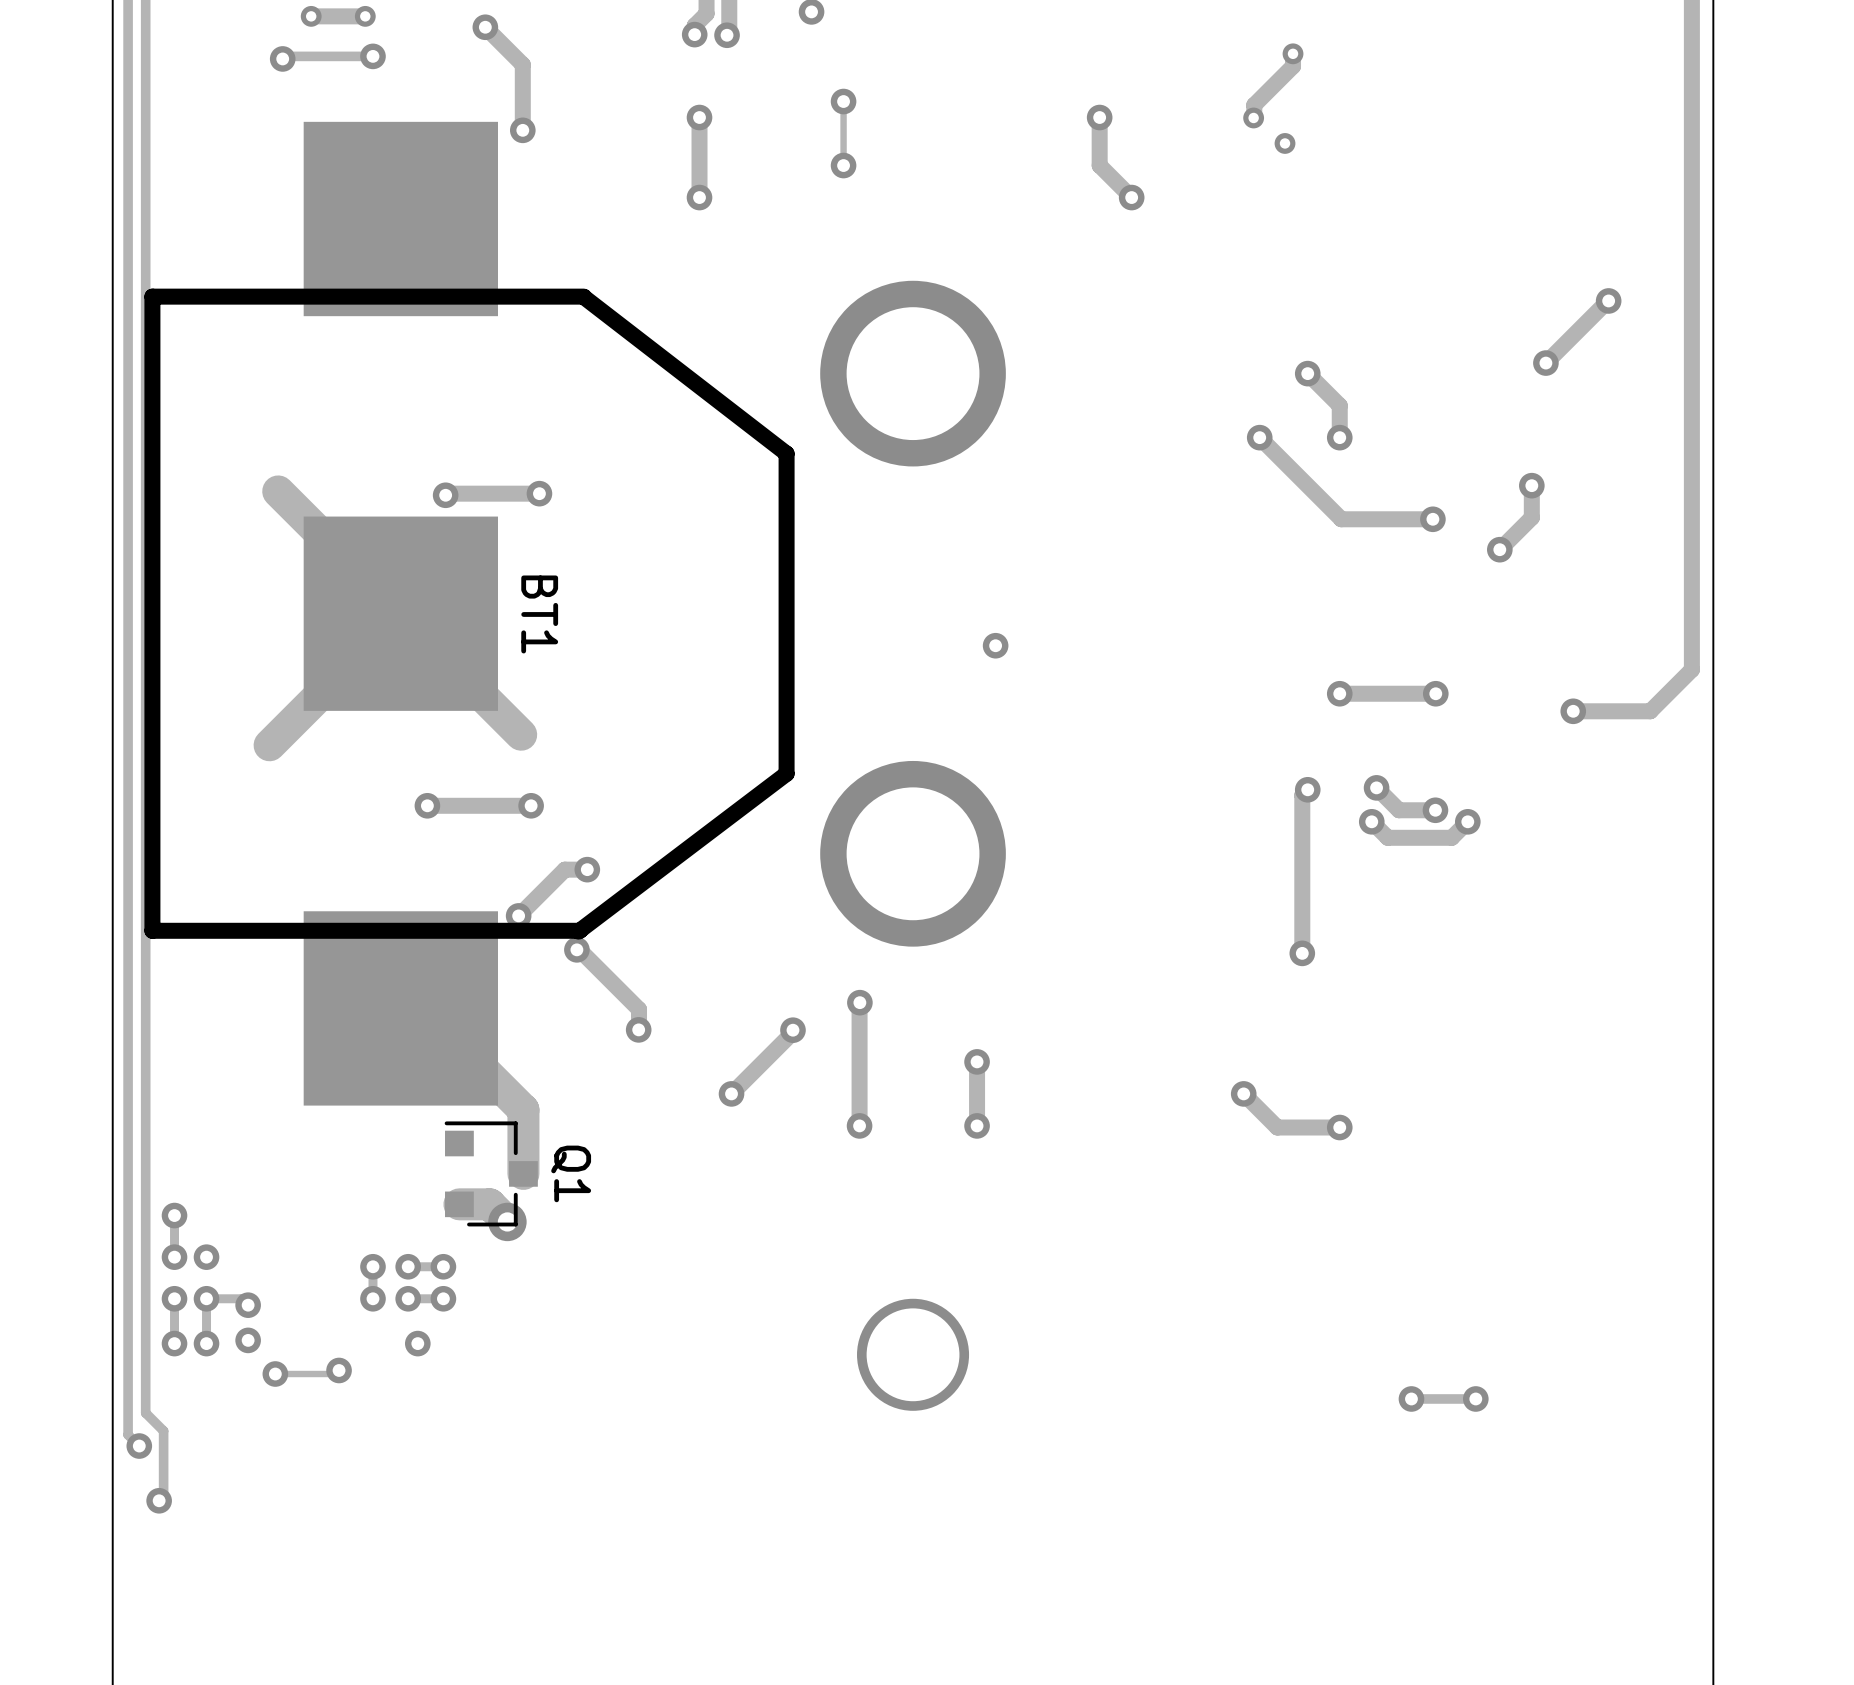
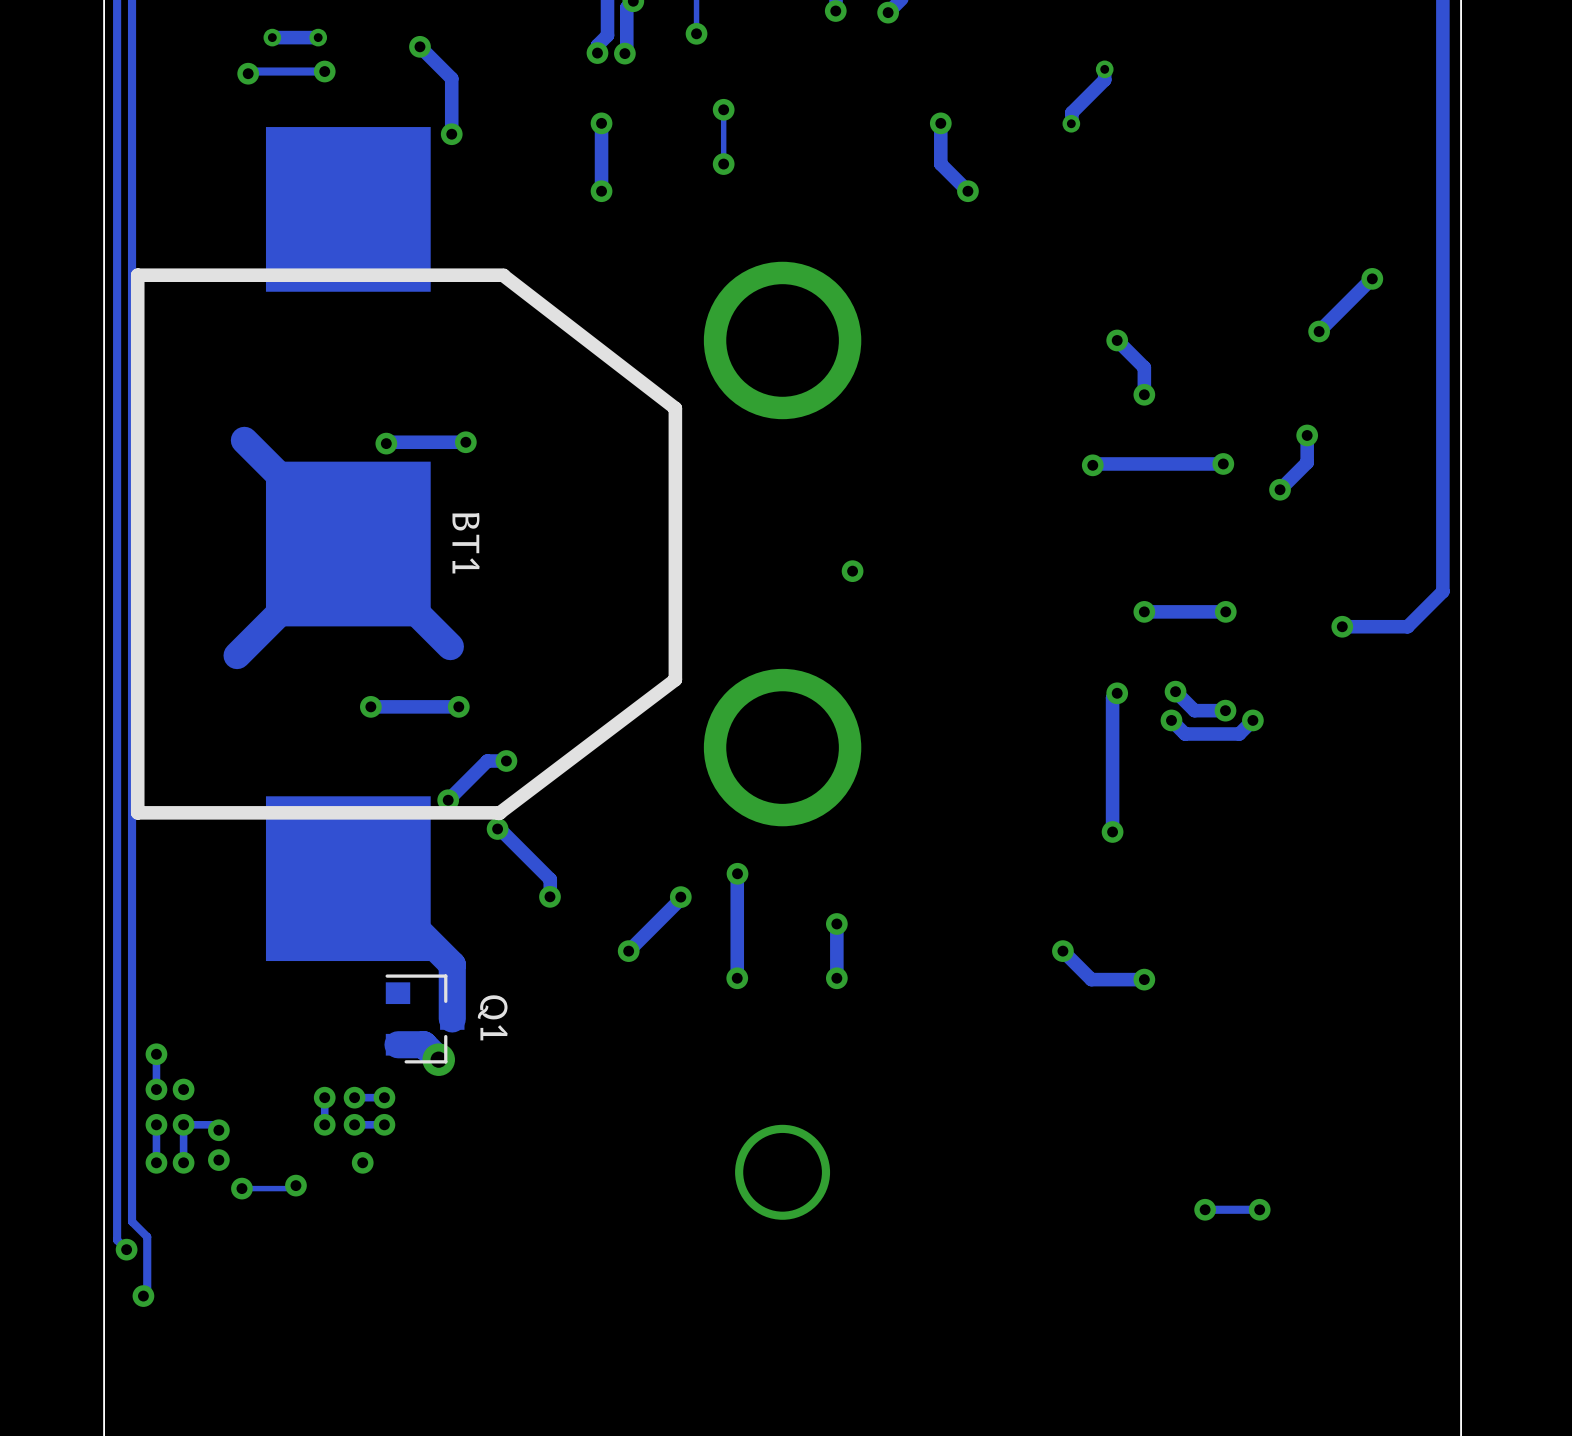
via: (1285, 143) -> none
track: (1259, 437) (1341, 519) -> (1092, 465) (1145, 463)
via position: (1259, 437) -> (1092, 465)

